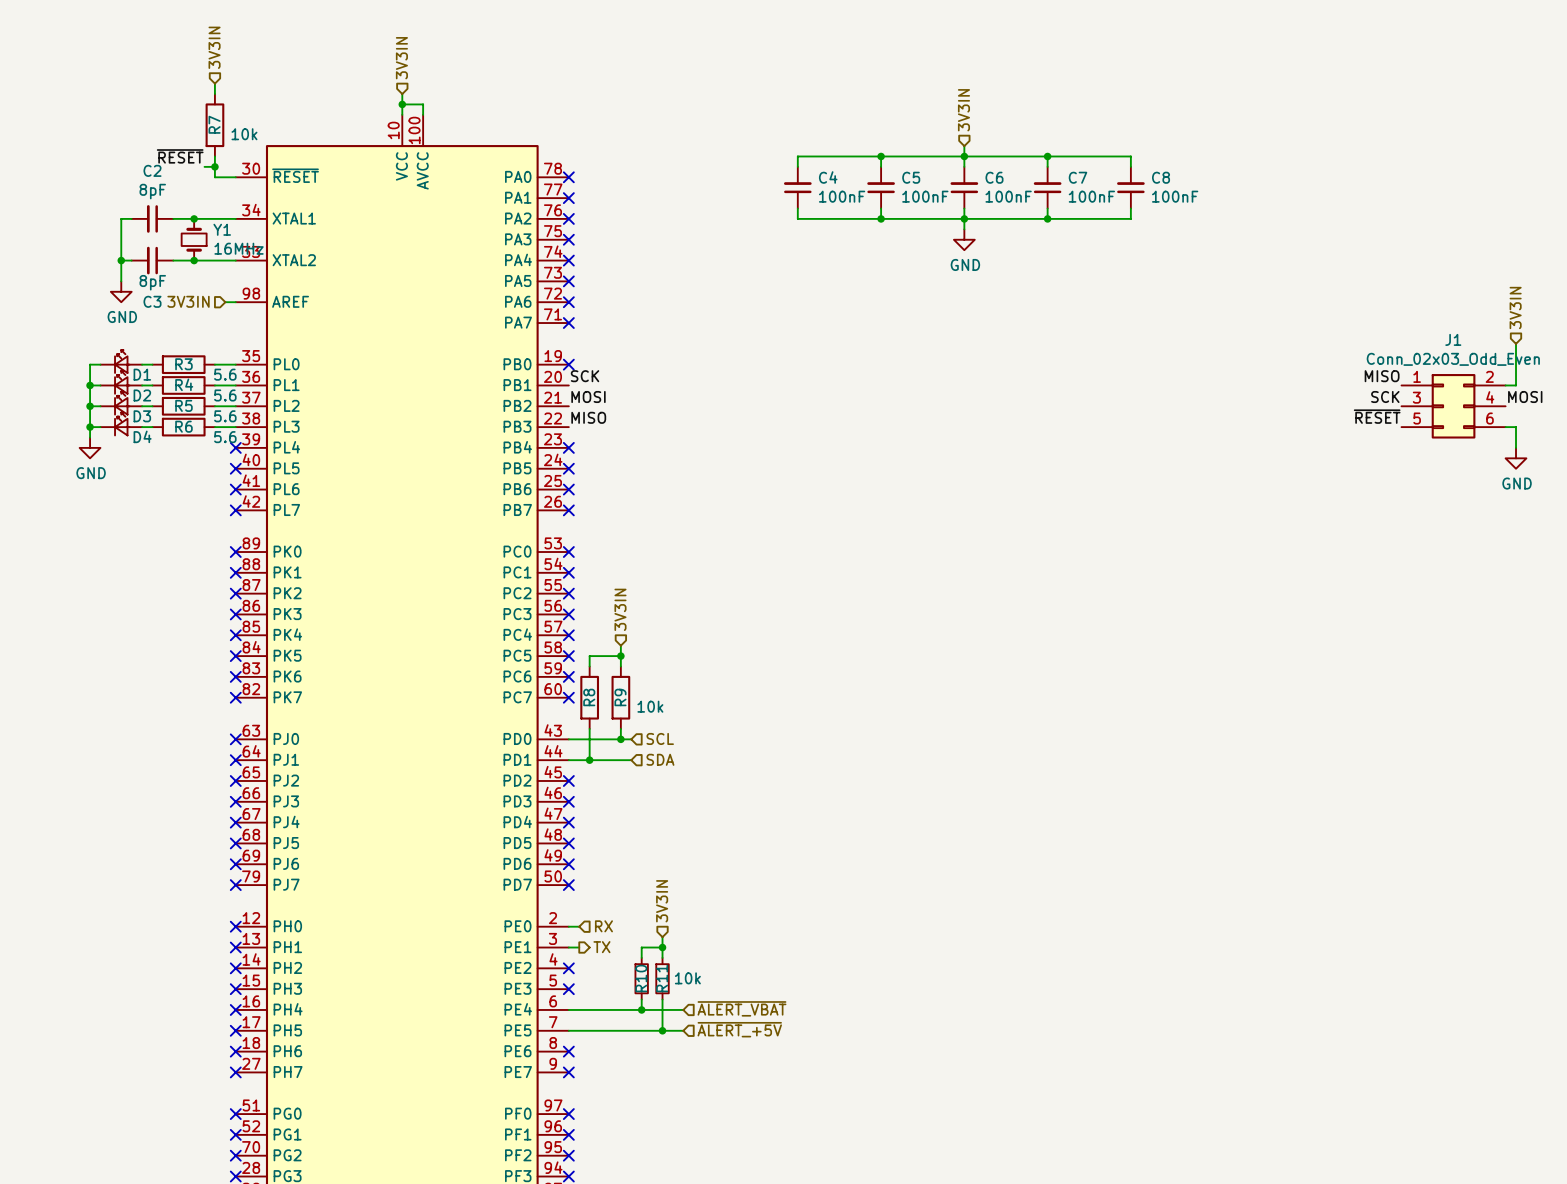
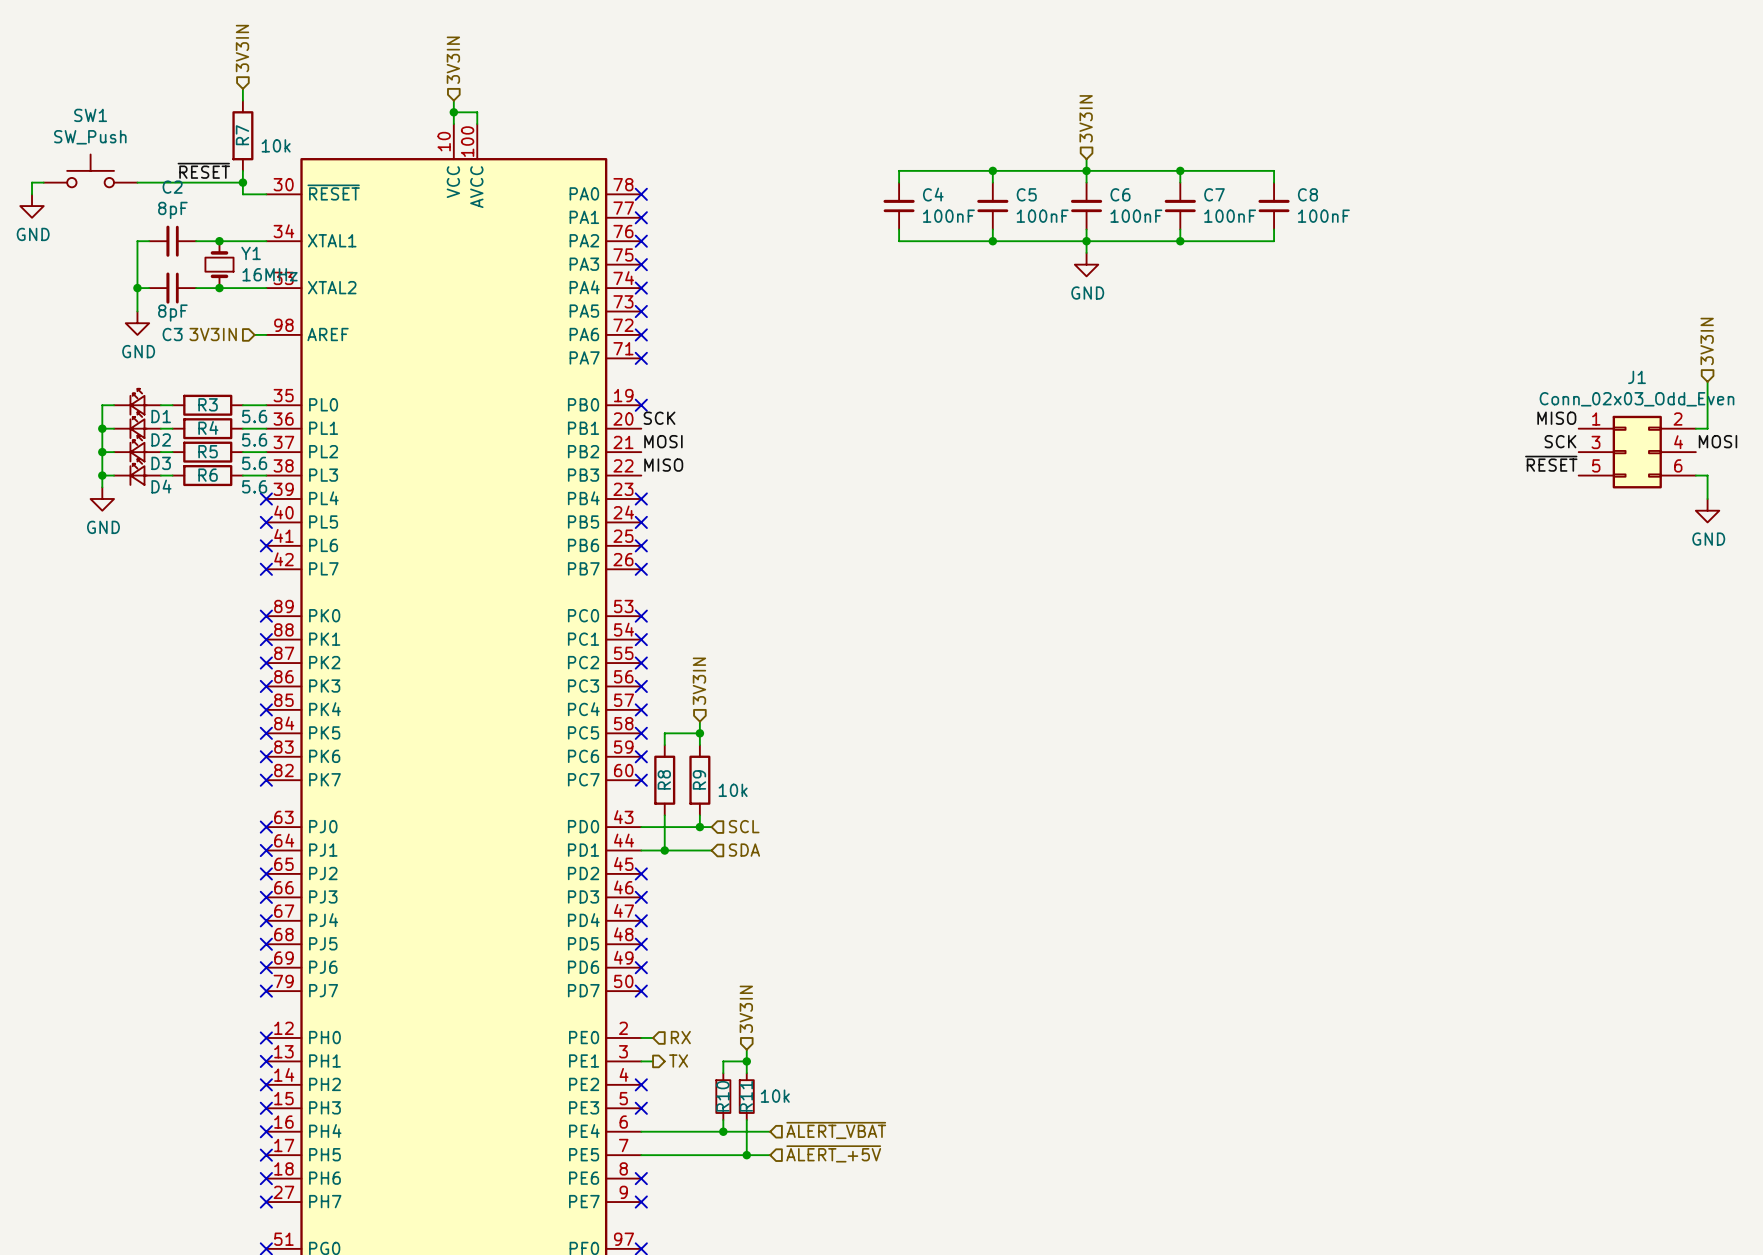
SW1: none -> SW_Push (90, 170)
wire: none -> (43, 182) (32, 182) (32, 194)
wire: none -> (137, 182) (231, 182)
power symbol: none -> GND (32, 206)

